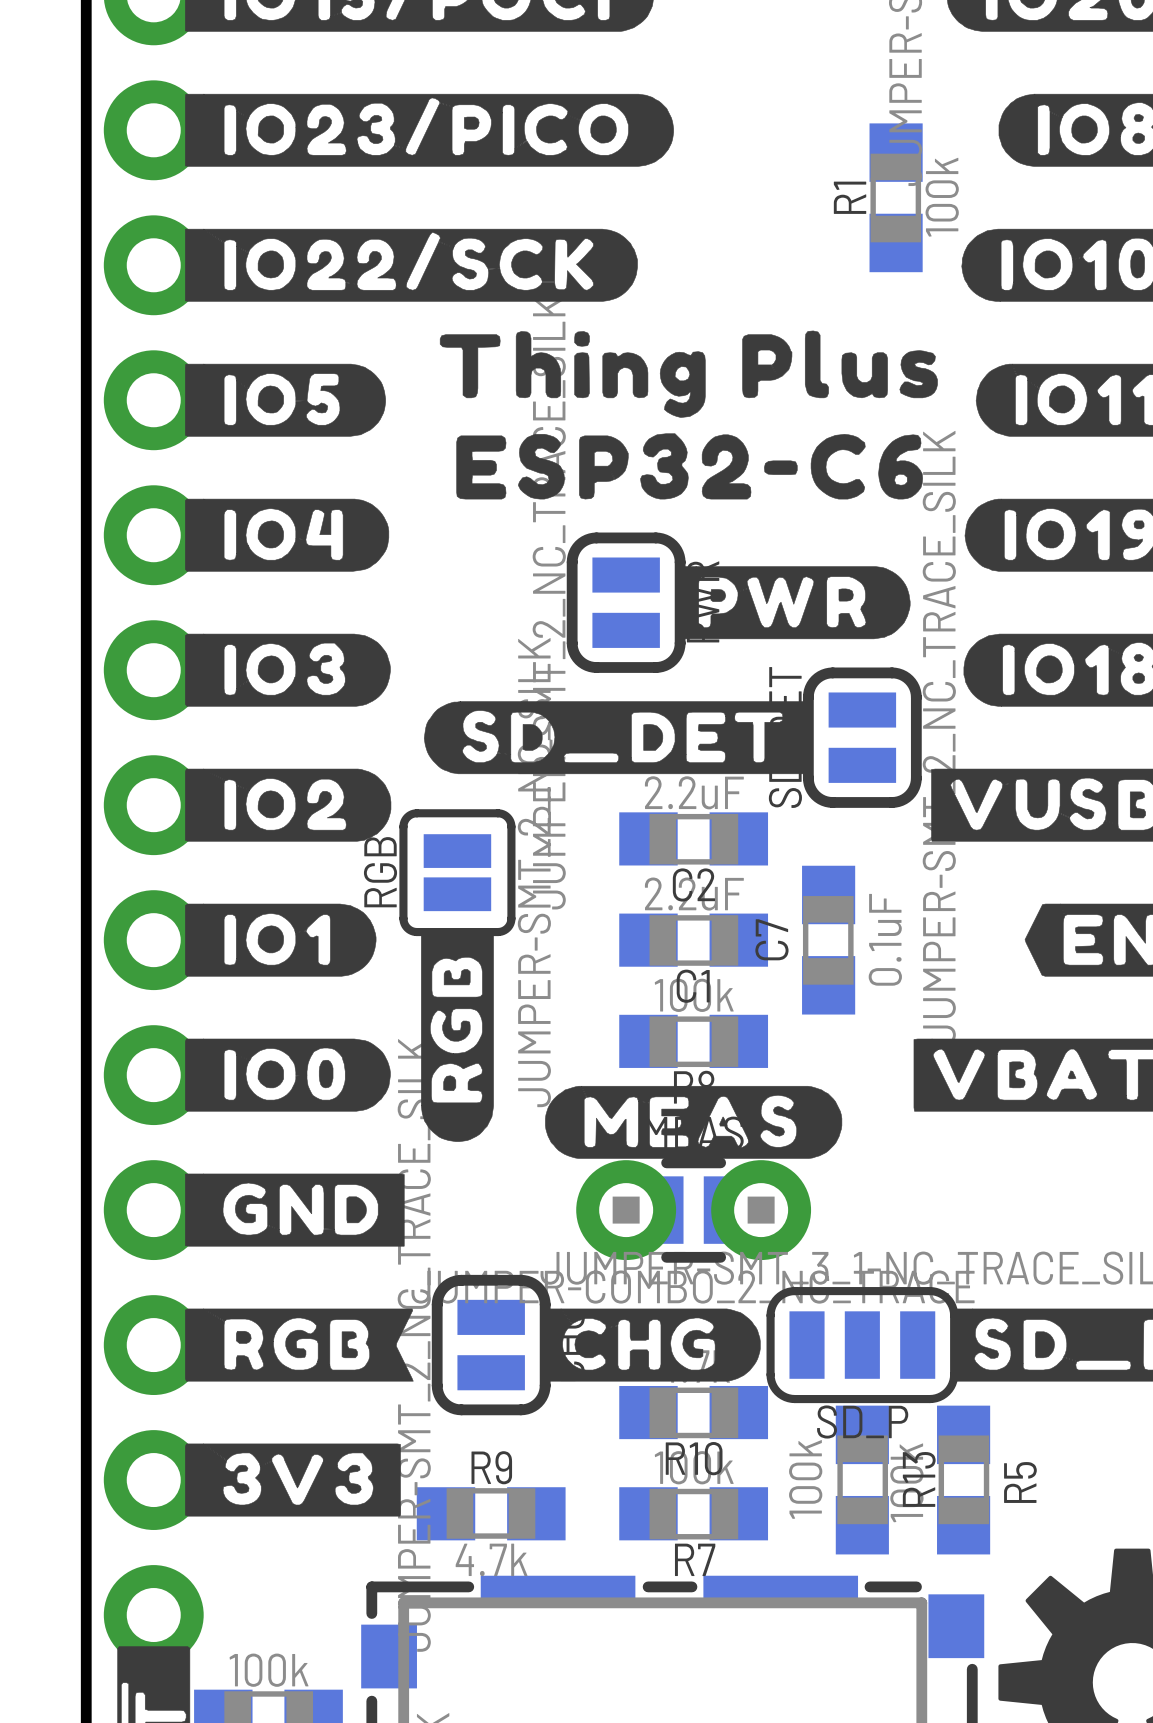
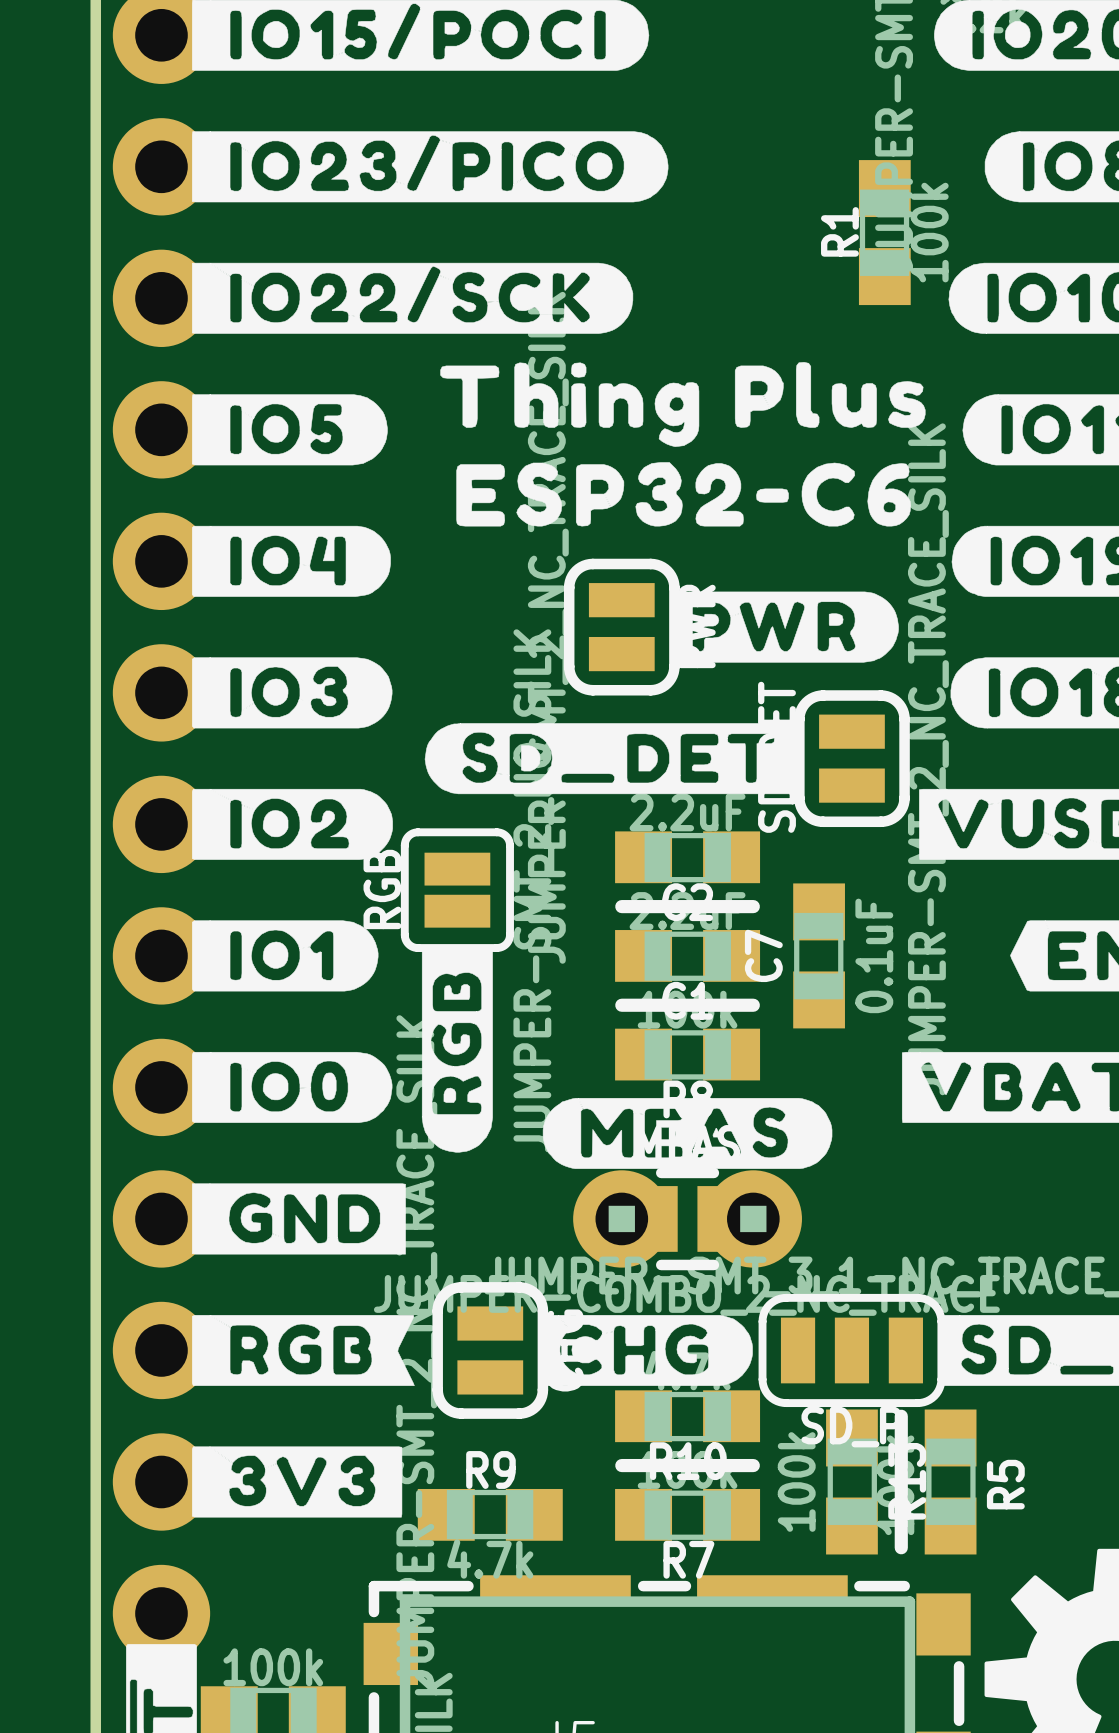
line: none -> (753, 906) (621, 906)
line: none -> (753, 1005) (621, 1005)
line: none -> (901, 1416) (901, 1547)
line: none -> (753, 1465) (621, 1465)

